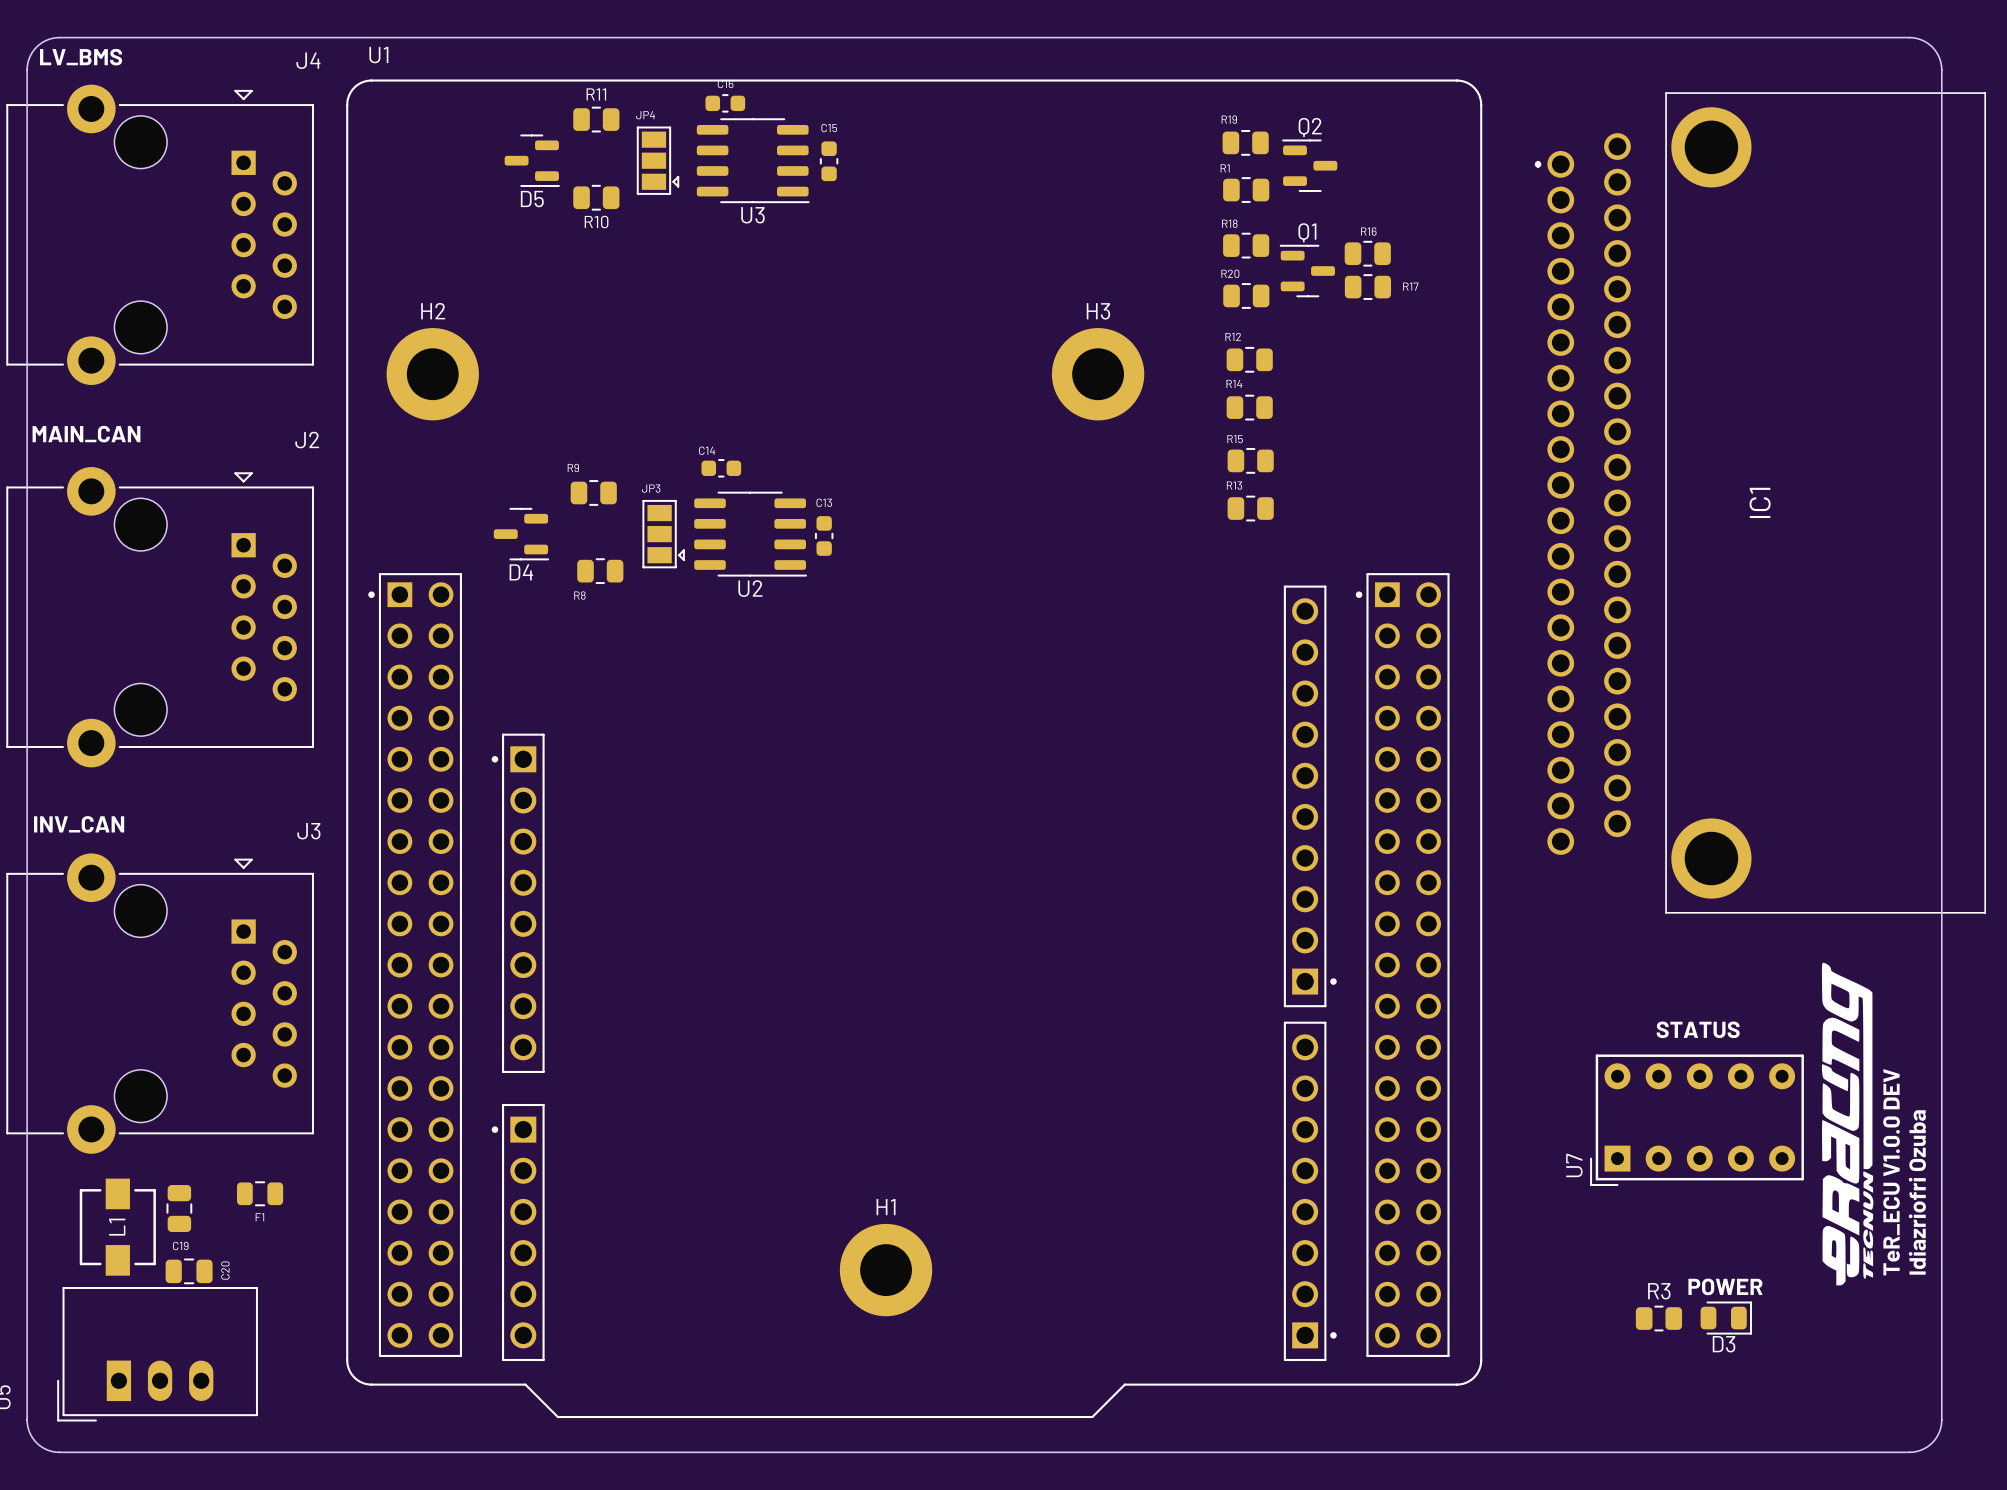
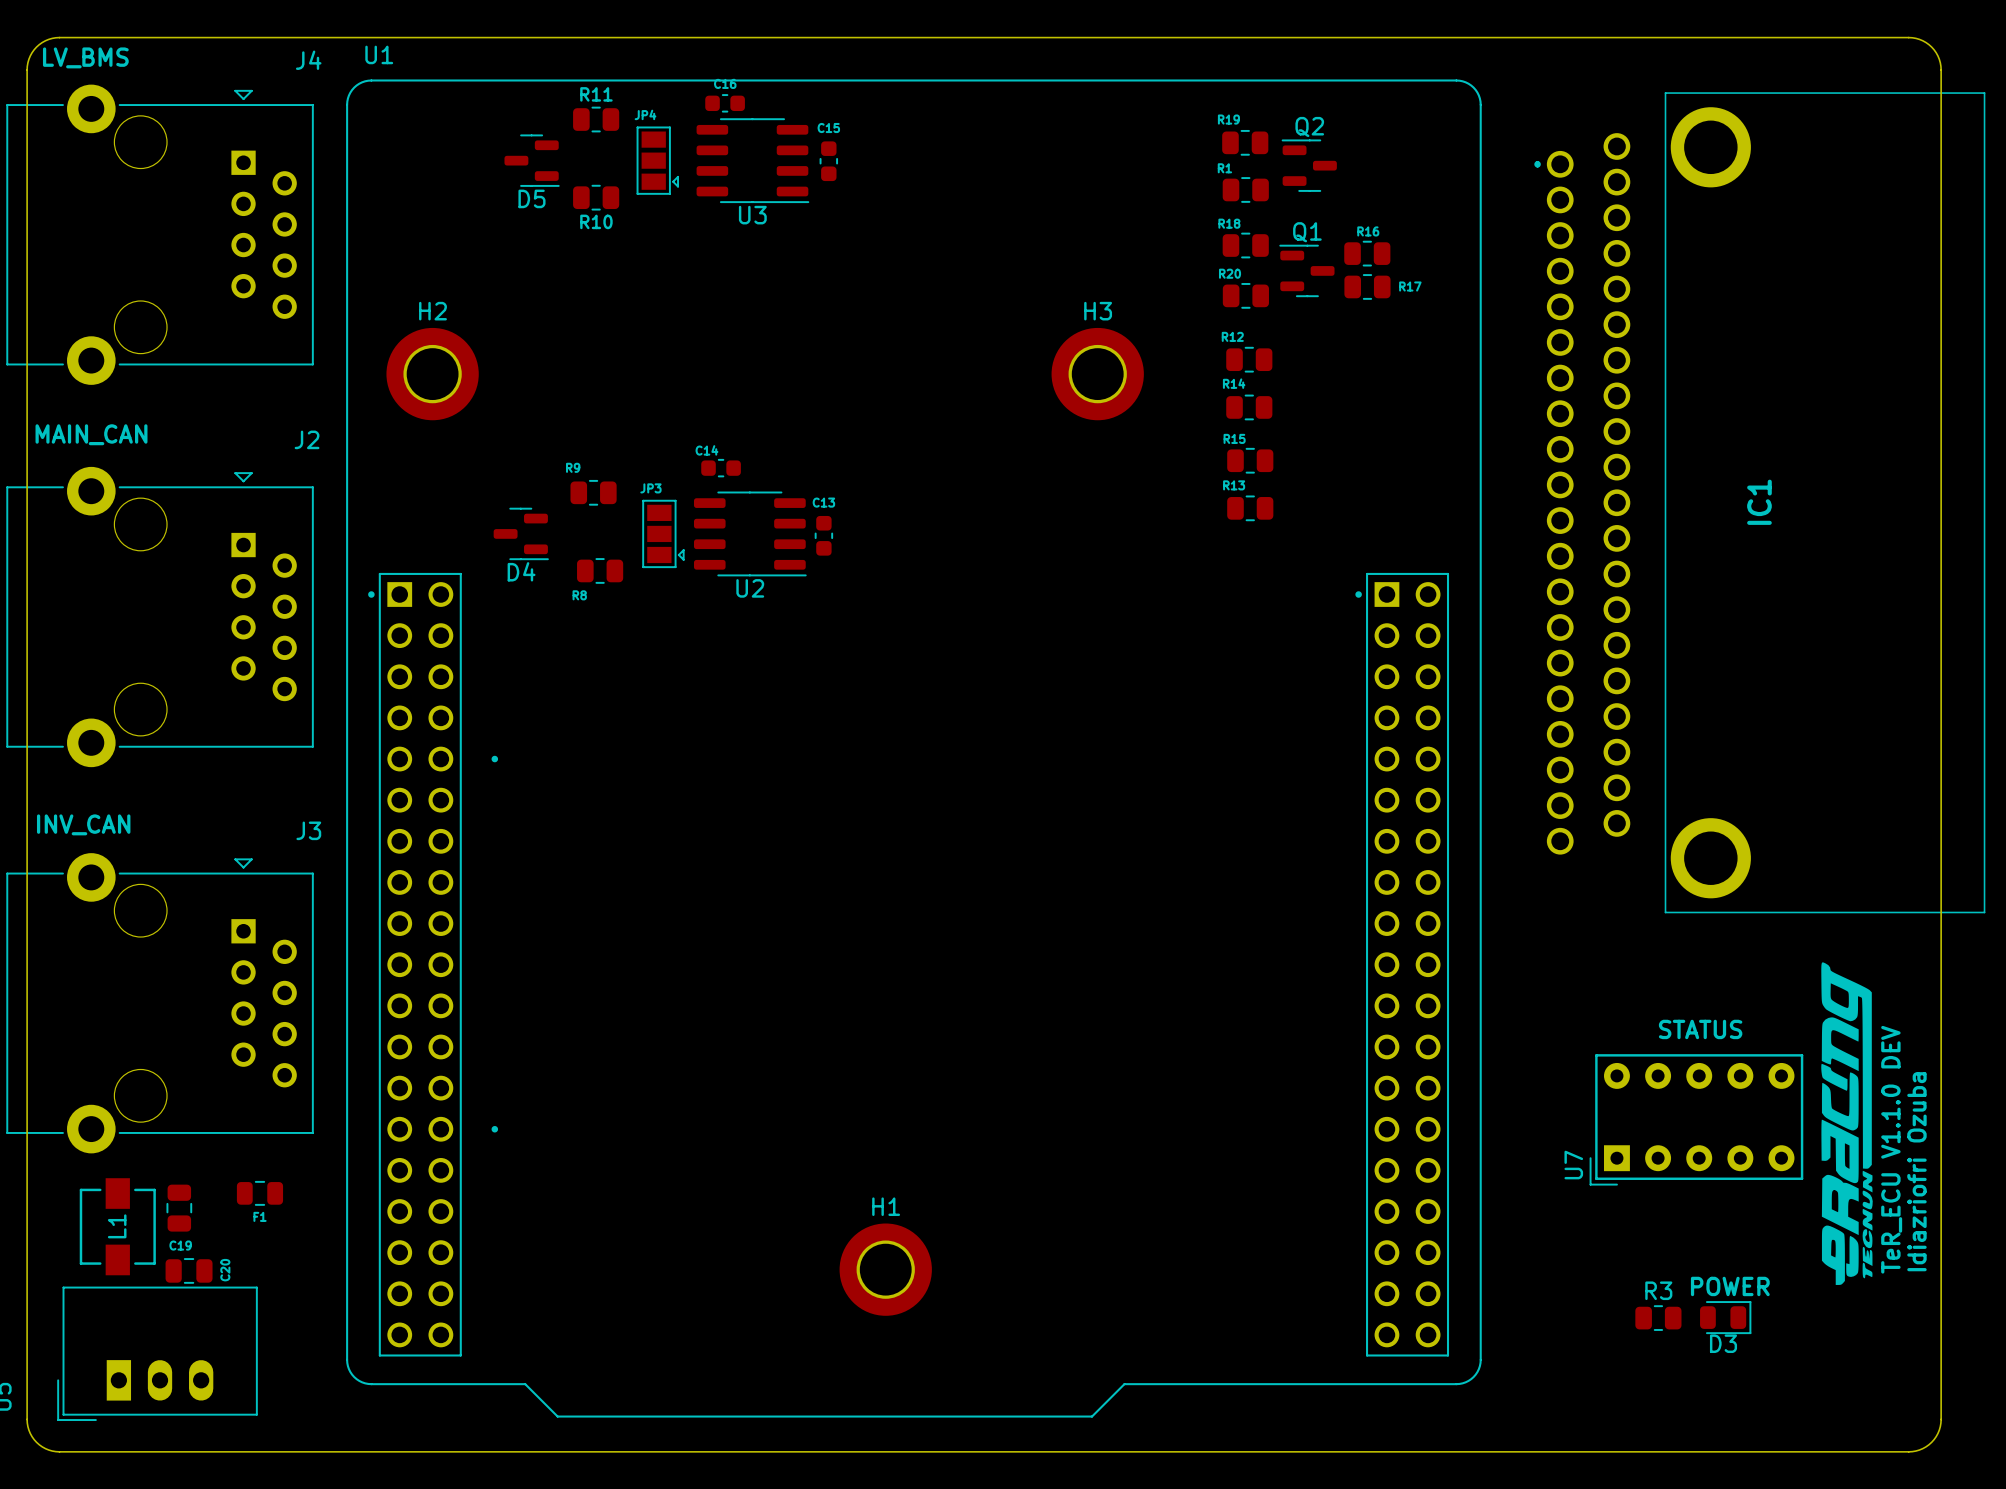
U1 footprint: [346, 79, 1483, 1419] -> [346, 79, 1482, 1418]
text: TeR_ECU V1.0.0 DEV (1891, 1172) -> TeR_ECU V1.1.0 DEV (1891, 1149)

